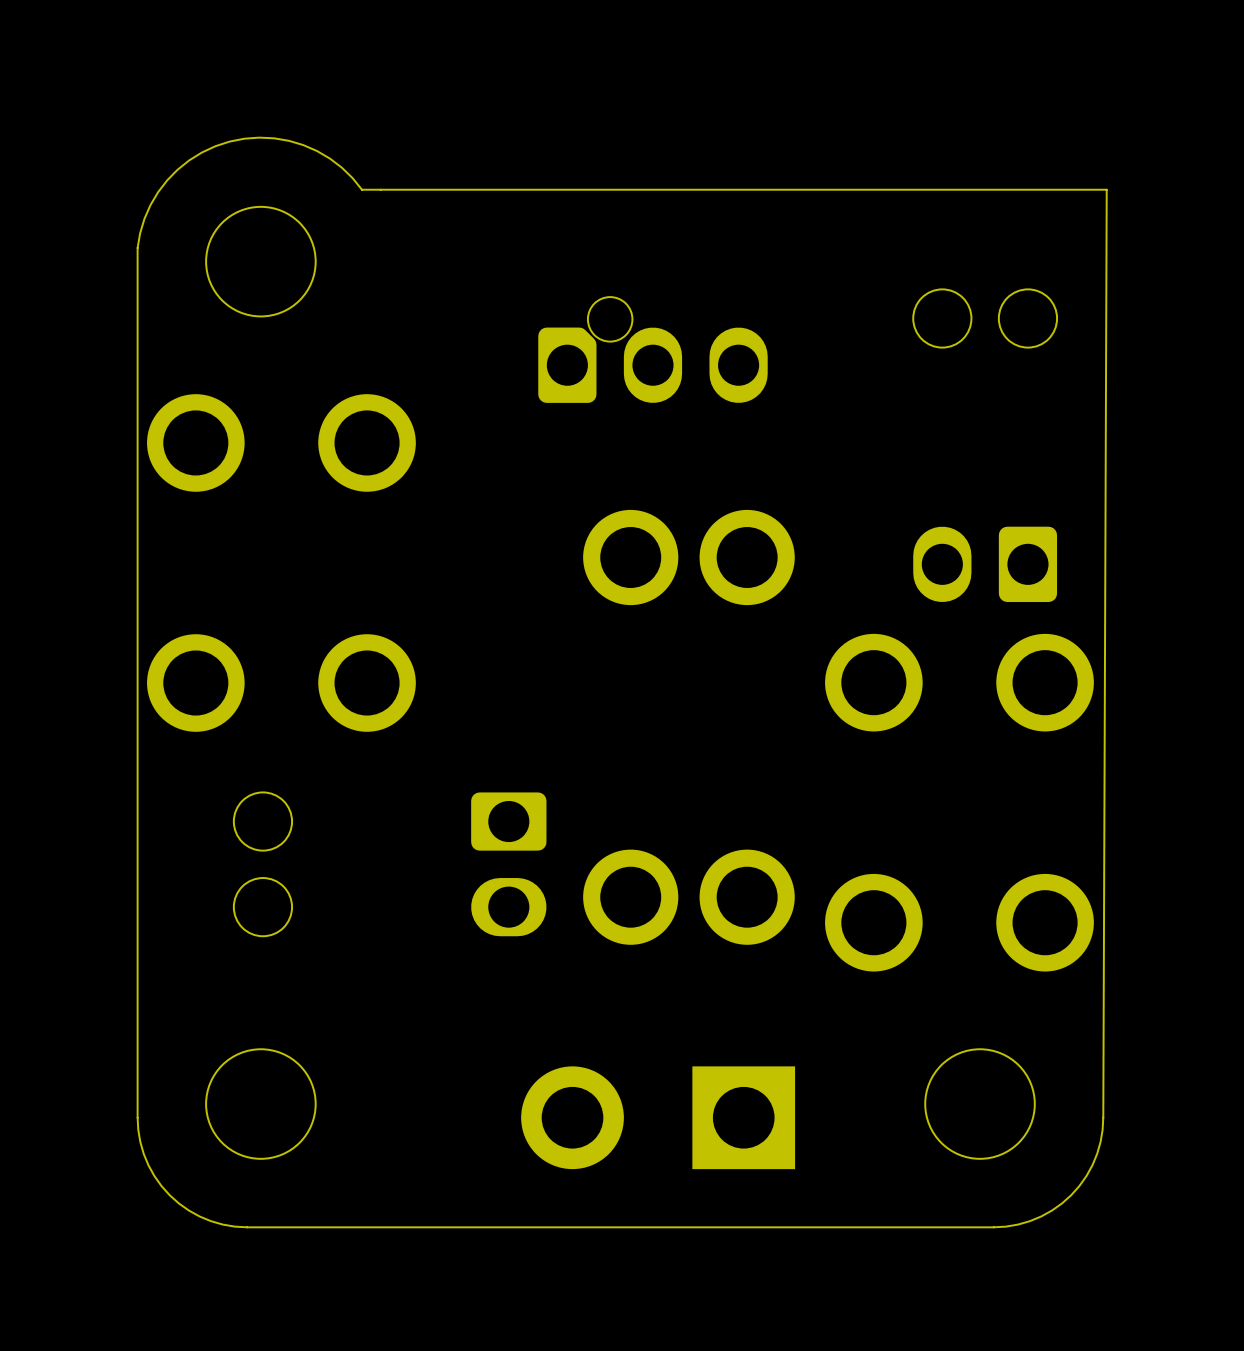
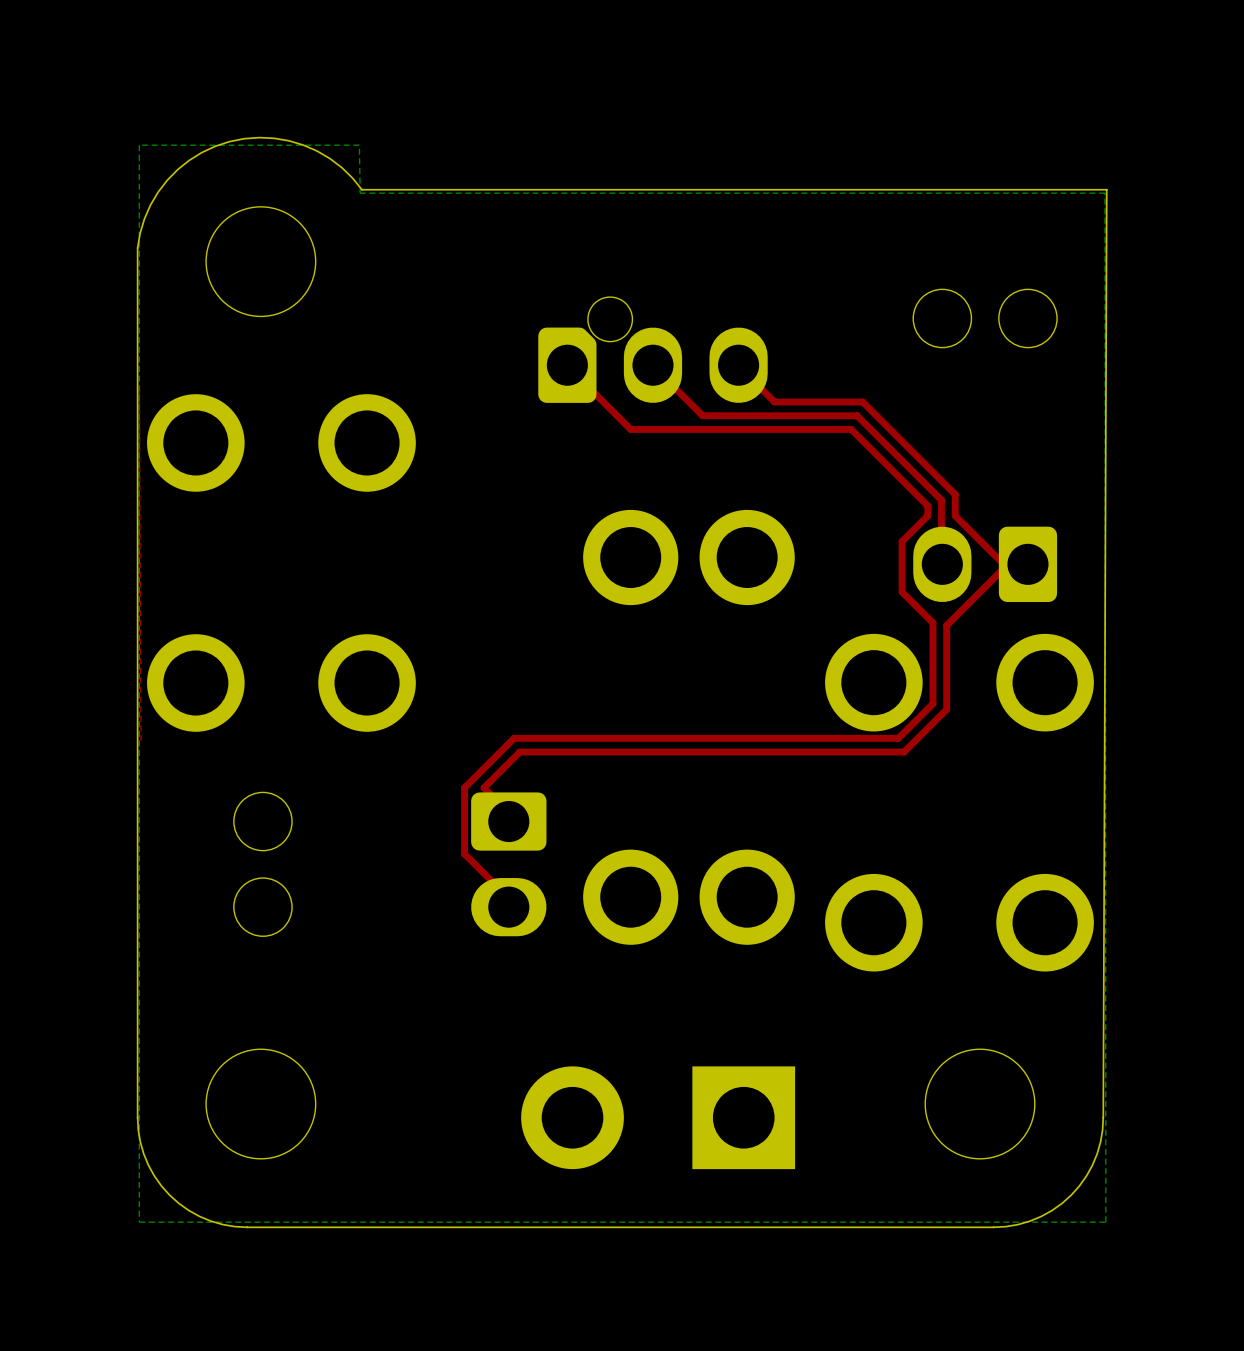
bottom zone outline: none -> (359, 145) (360, 193) (1105, 193) (1105, 1222) (139, 1222) (139, 145) (359, 145)
top track: none -> (569, 367) (630, 429) (851, 429) (927, 505) (927, 515) (902, 541) (902, 592) (932, 622) (932, 703) (898, 738) (514, 738) (464, 787) (464, 854) (512, 902)
top track: none -> (654, 367) (702, 415) (857, 415) (941, 500) (941, 566)
top track: none -> (740, 367) (774, 402) (862, 402) (955, 494) (955, 515) (1005, 566)
top zone outline: none -> (139, 385) (141, 741)
top track: none -> (1005, 566) (946, 625) (946, 709) (904, 752) (519, 752) (484, 787) (512, 816)

